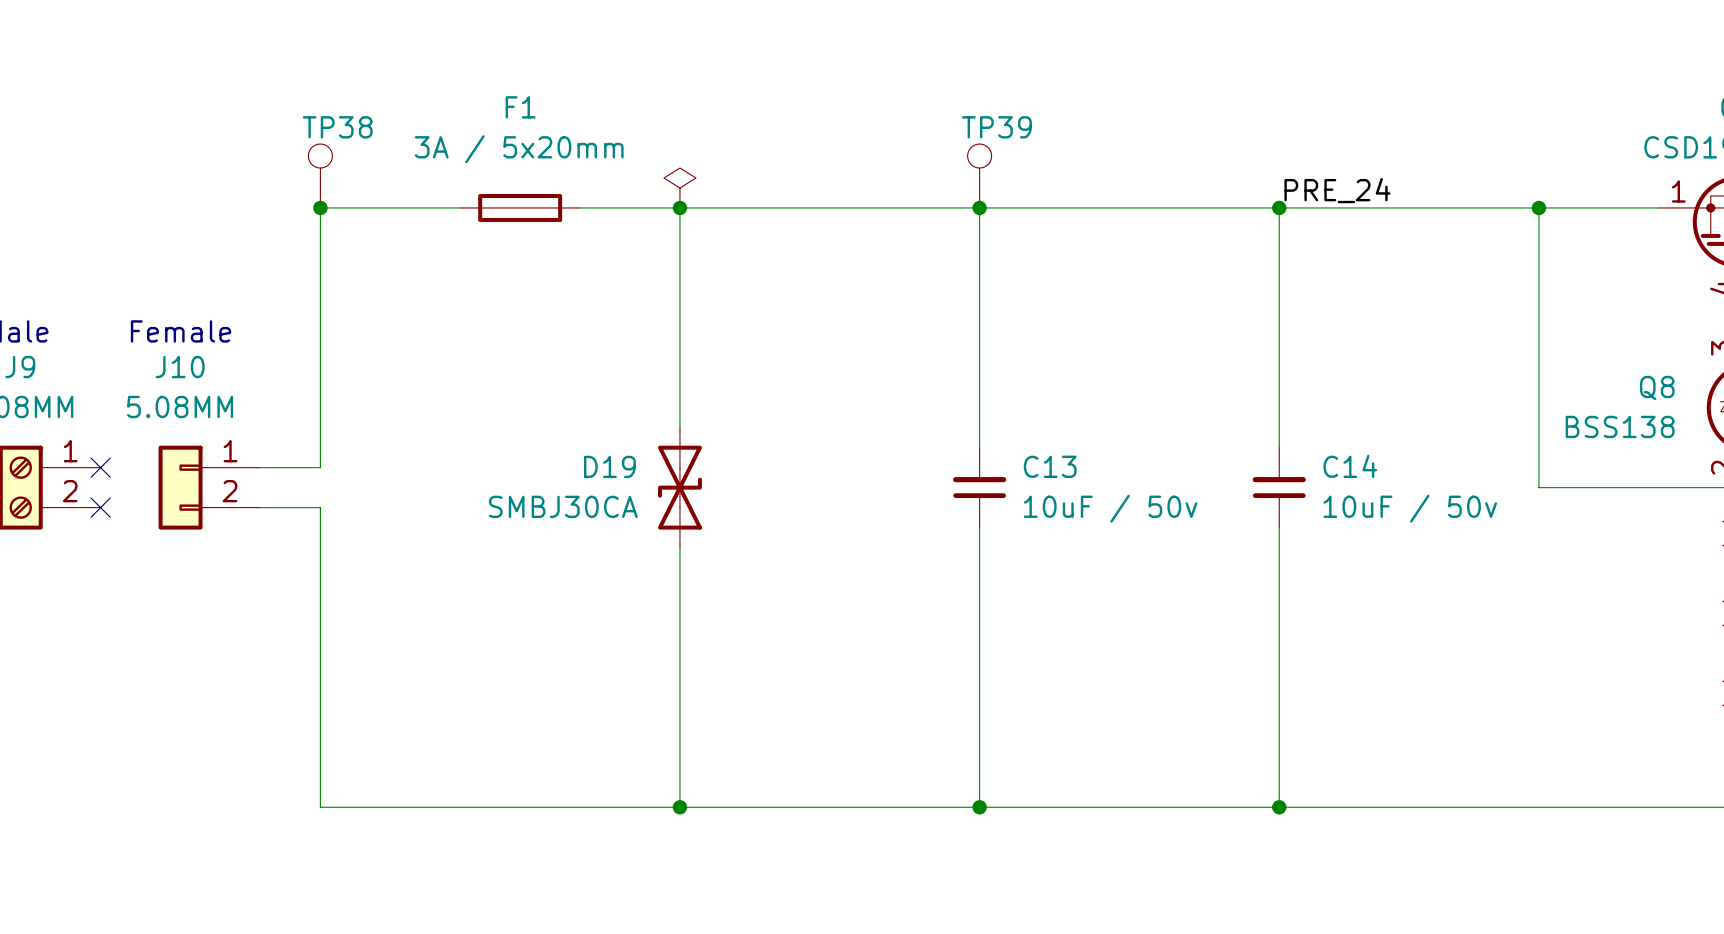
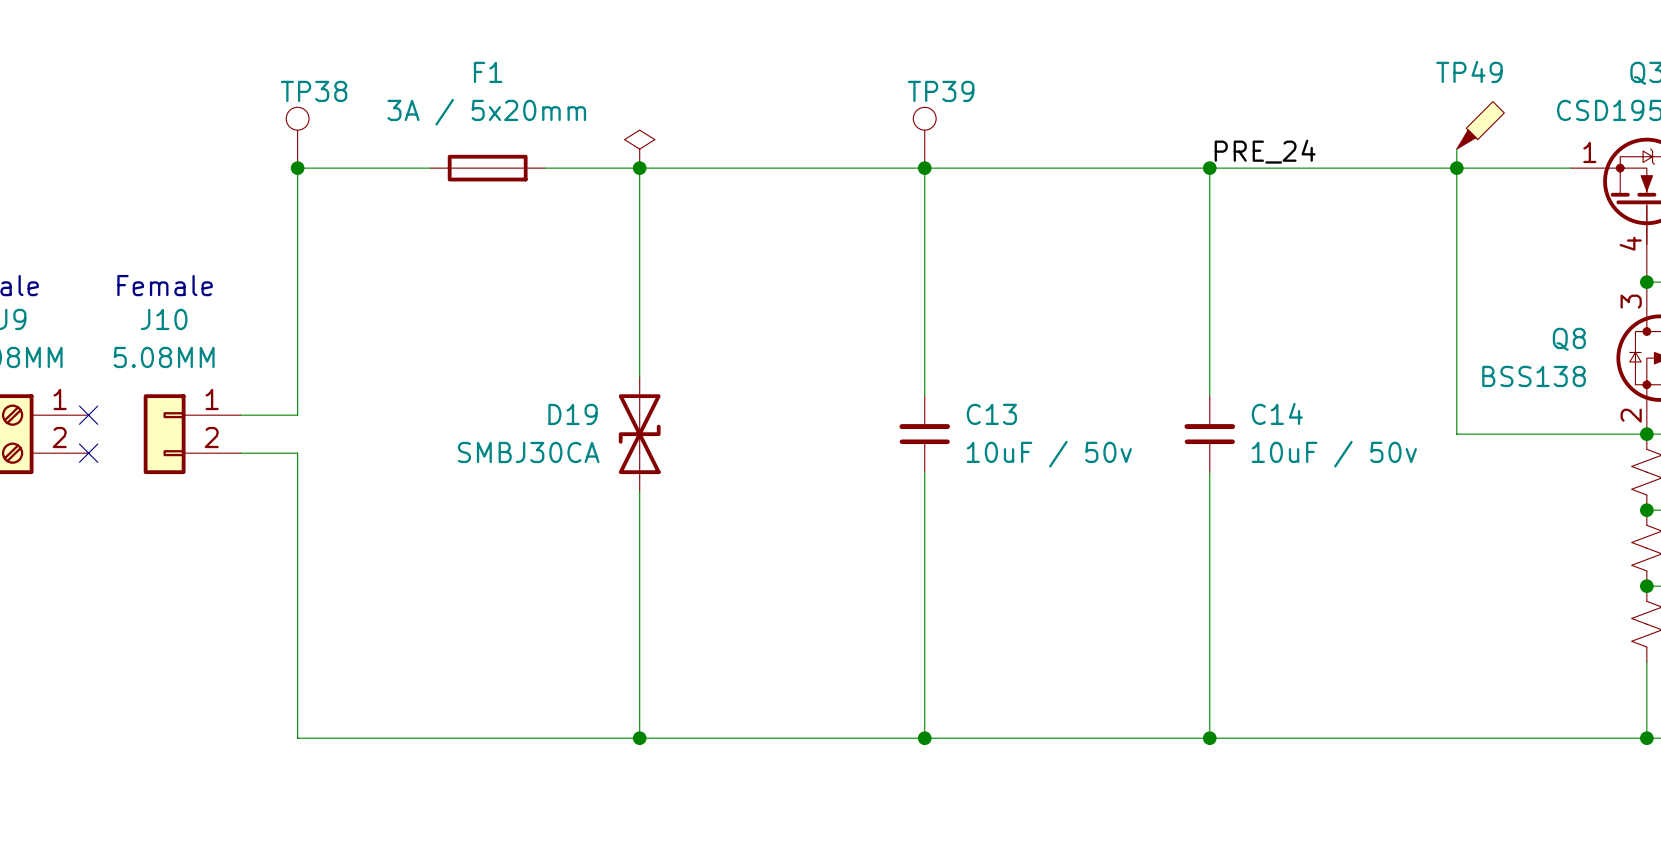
TP49: none -> (1480, 125)
wire: none -> (1456, 149) (1456, 168)

